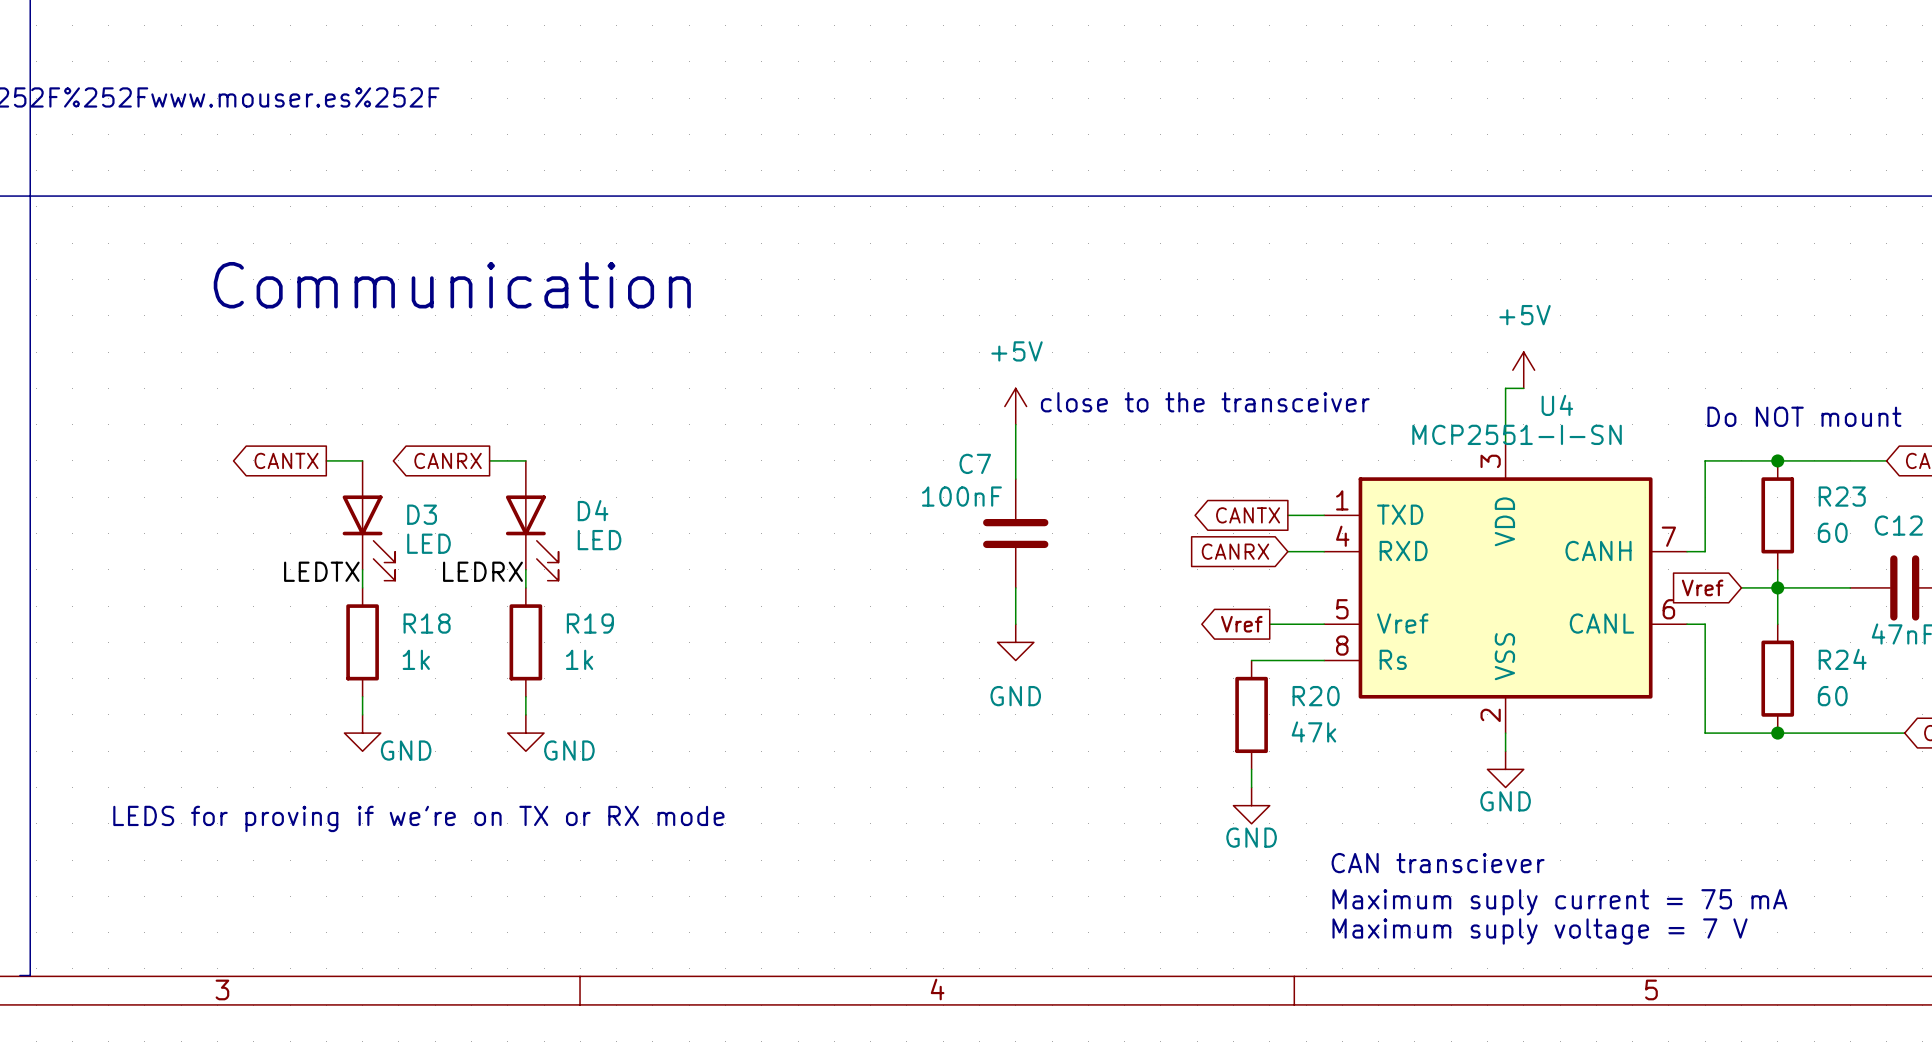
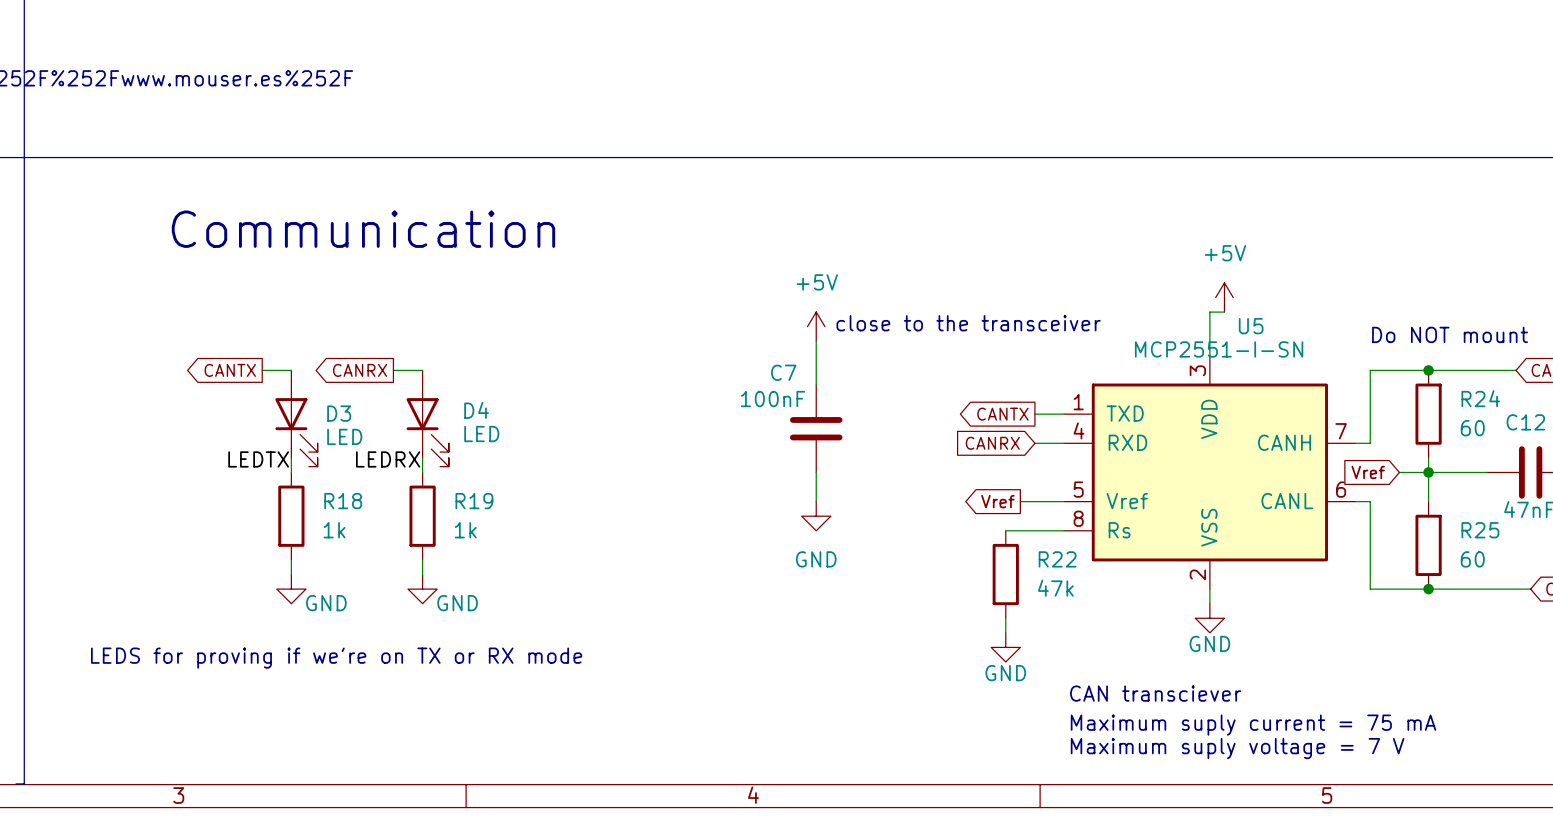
U4 name: U4 (1557, 405) -> U5 (1251, 326)
R23 name: R23 (1842, 496) -> R24 (1480, 398)
R24 name: R24 (1842, 659) -> R25 (1480, 530)
R20 name: R20 (1316, 696) -> R22 (1057, 559)

